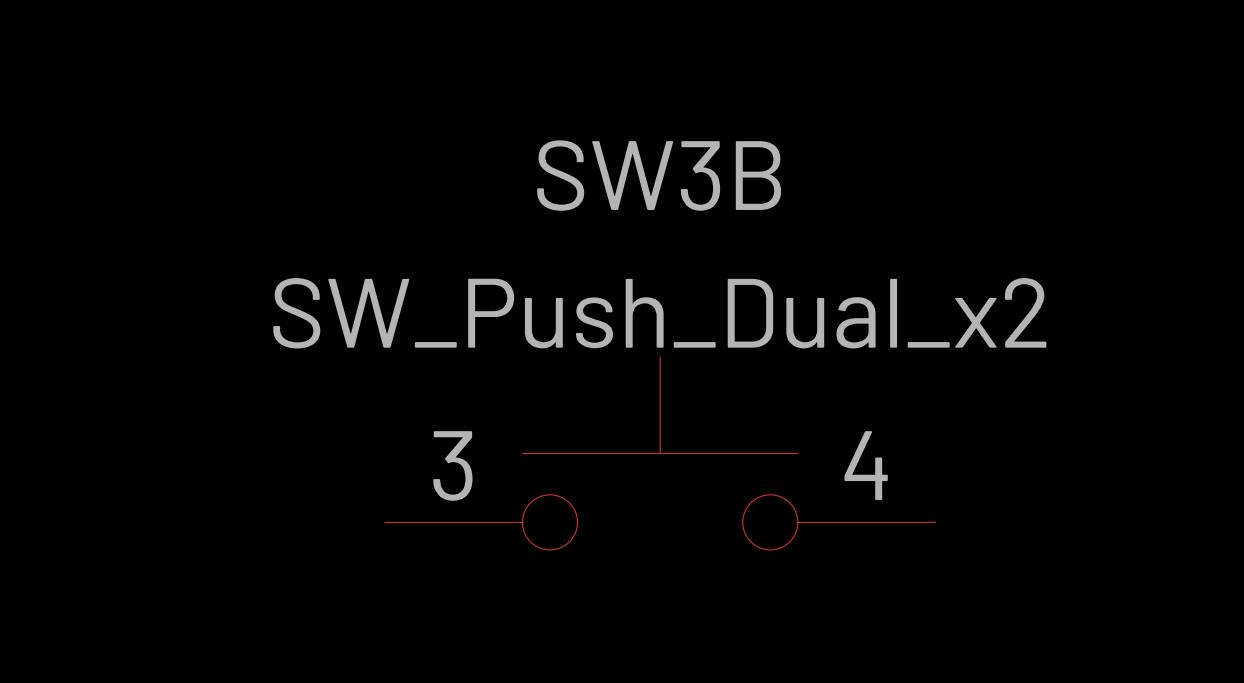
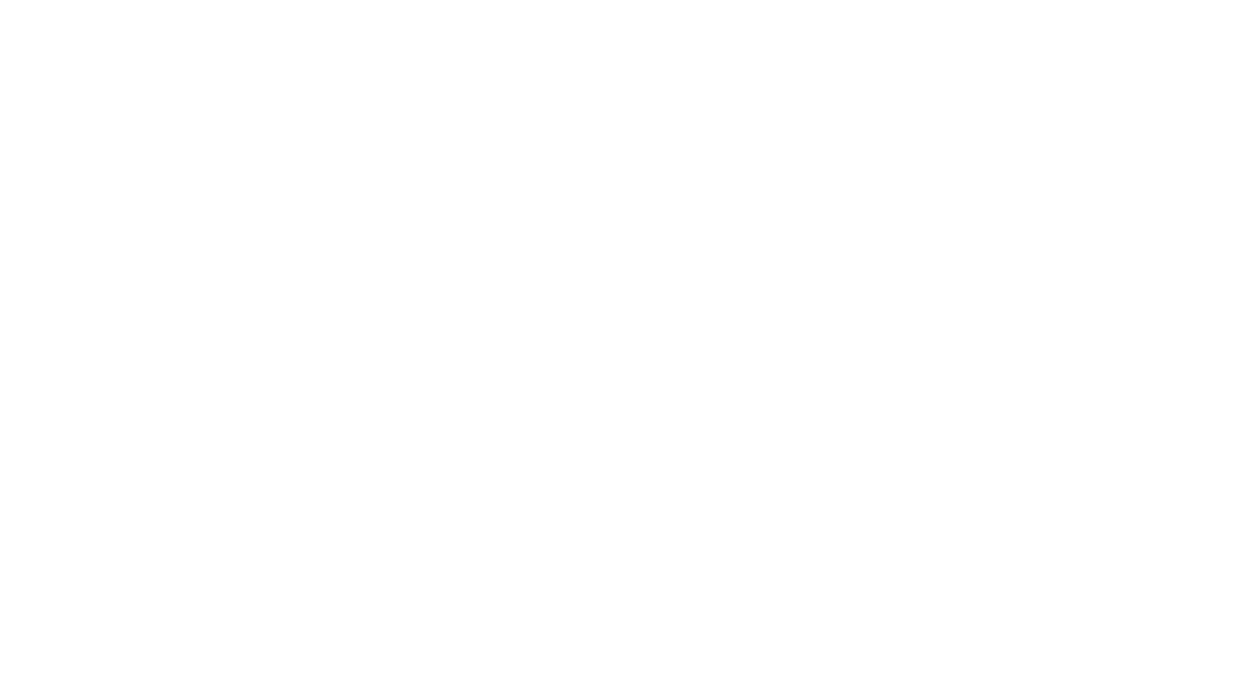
SW3B: SW_Push_Dual_x2 (660, 453) -> none

